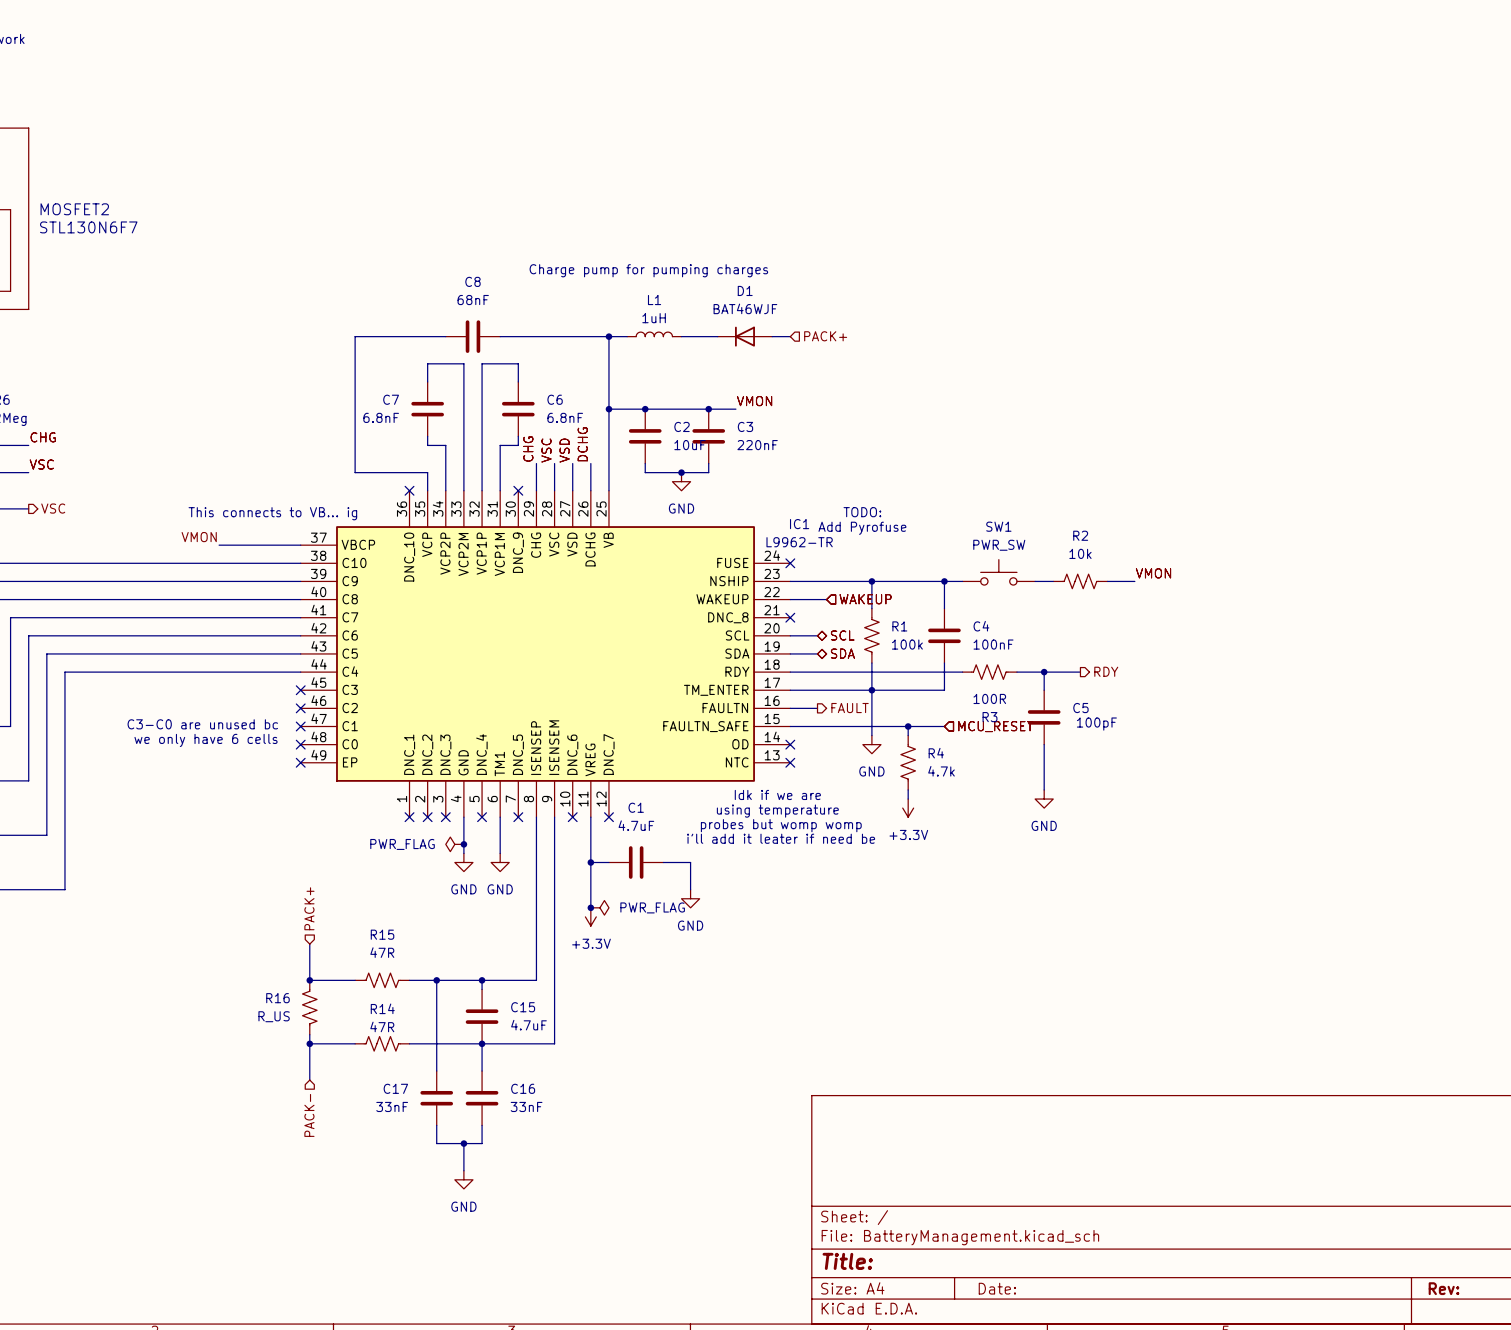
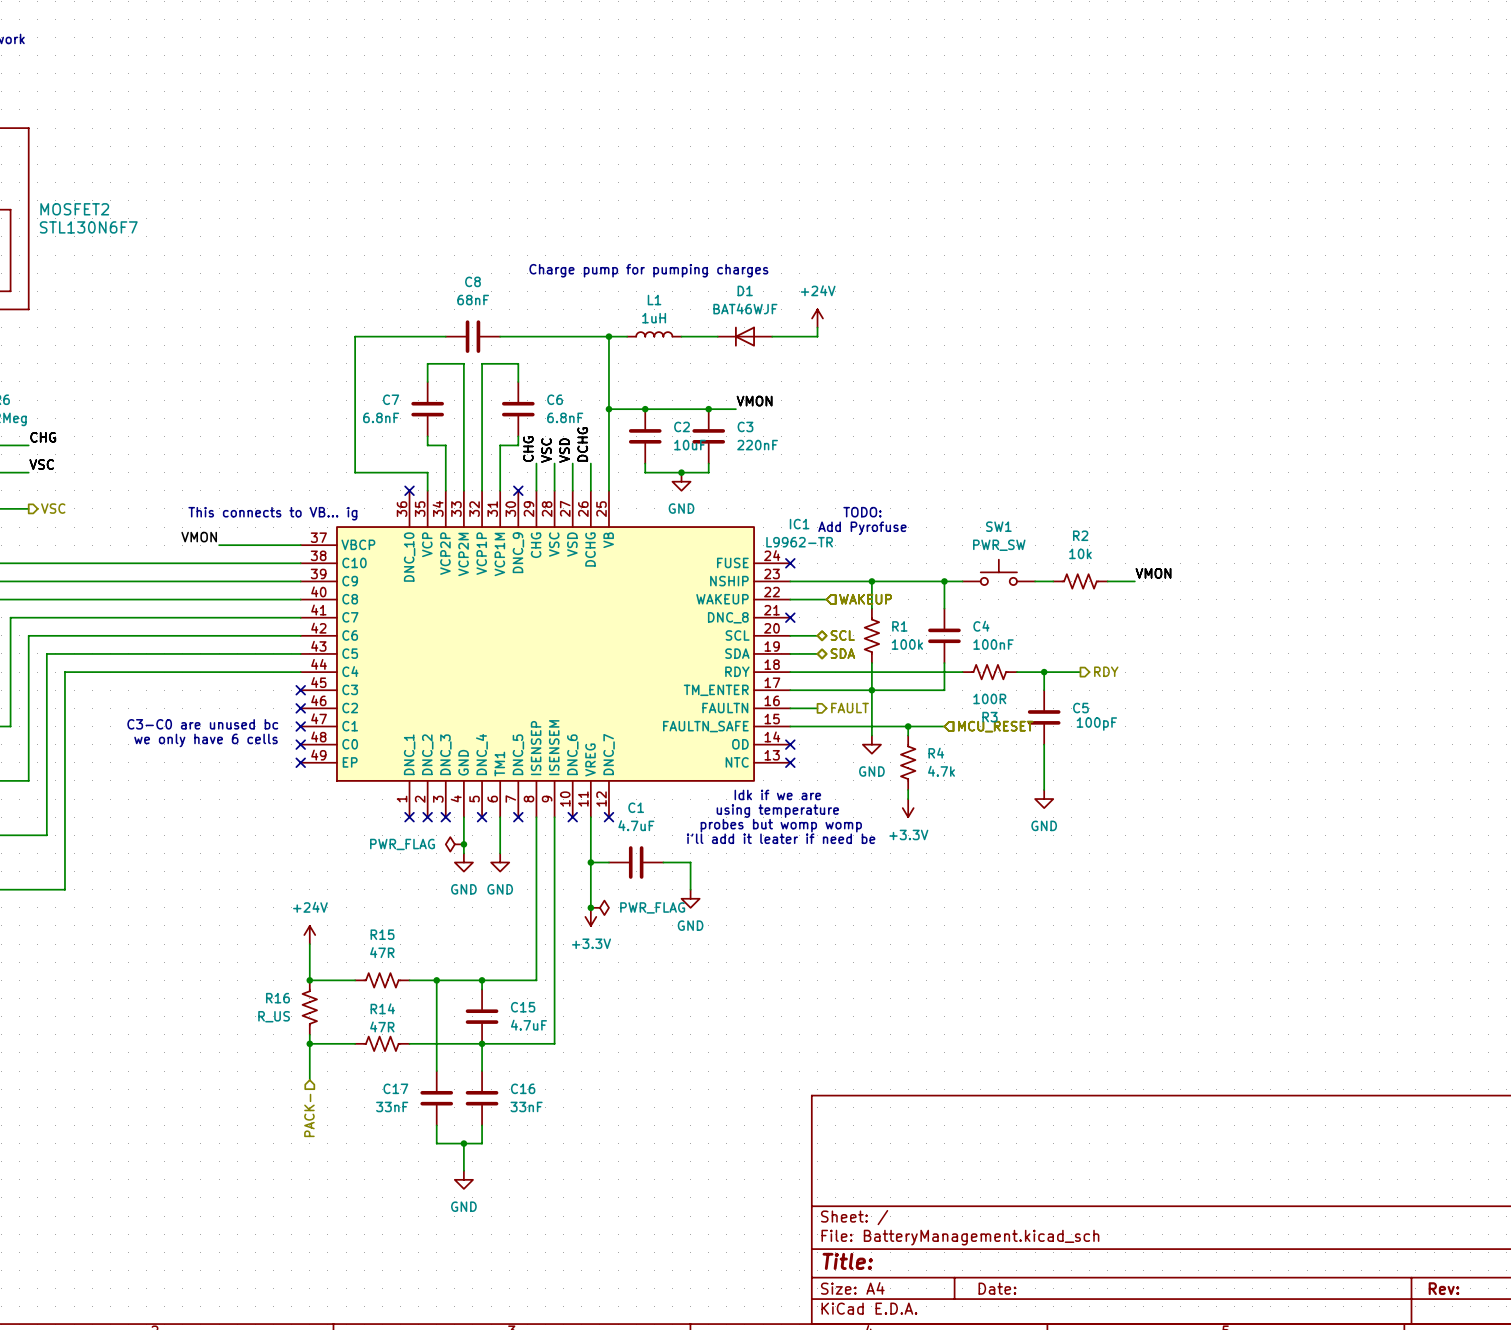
power symbol: none -> +24V (817, 318)
wire: none -> (817, 327) (817, 336) (790, 336)
hierarchical label: PACK+ (825, 336) -> none
hierarchical label: PACK+ (309, 908) -> none
power symbol: none -> +24V (309, 935)

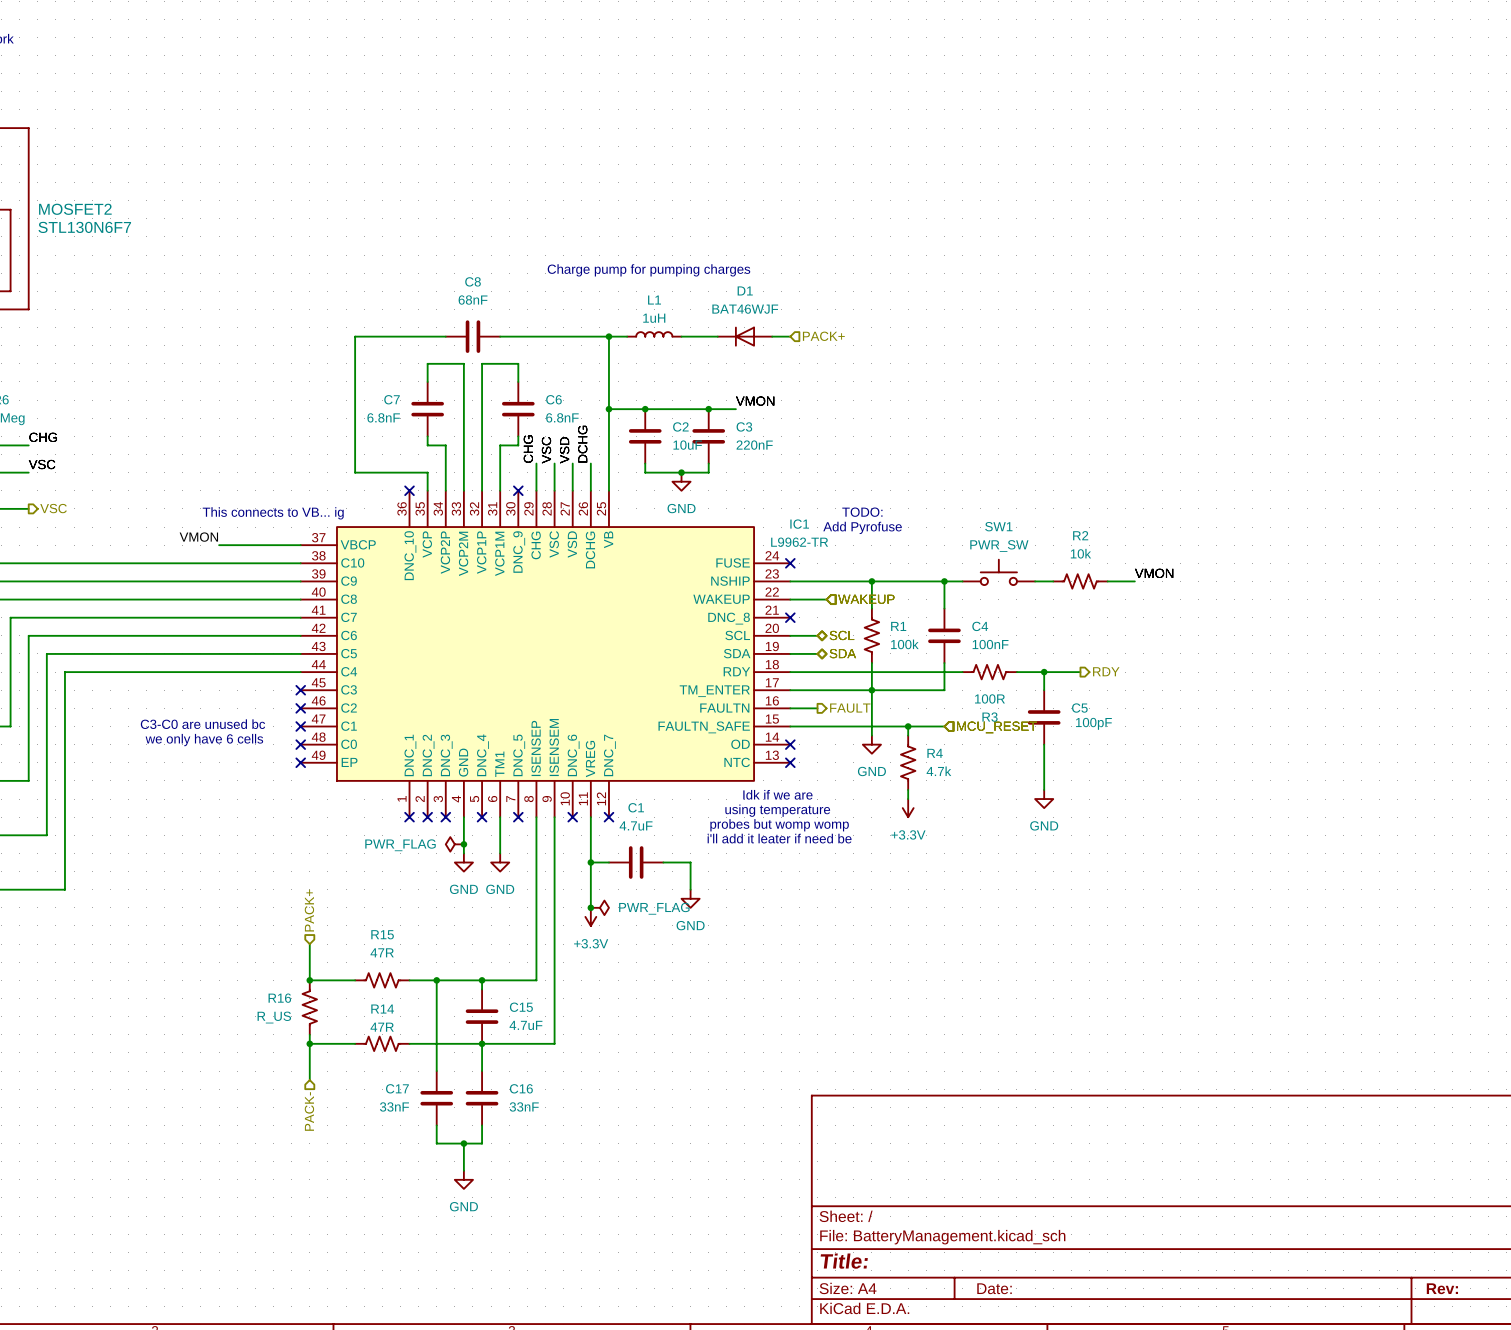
power symbol: +24V (817, 318) -> none
wire: (817, 327) (817, 336) (790, 336) -> none
hierarchical label: none -> PACK+ (823, 336)
hierarchical label: none -> PACK+ (309, 910)
power symbol: +24V (309, 935) -> none

